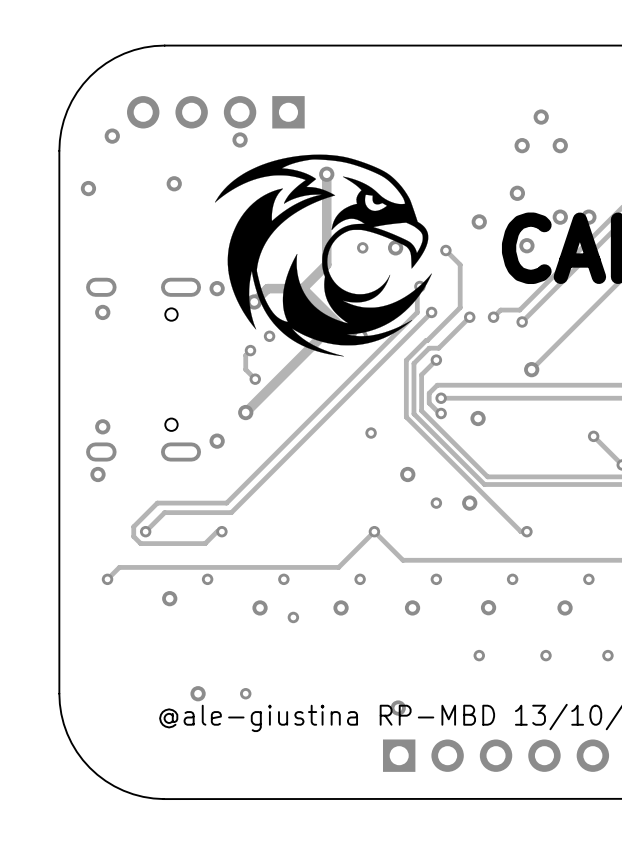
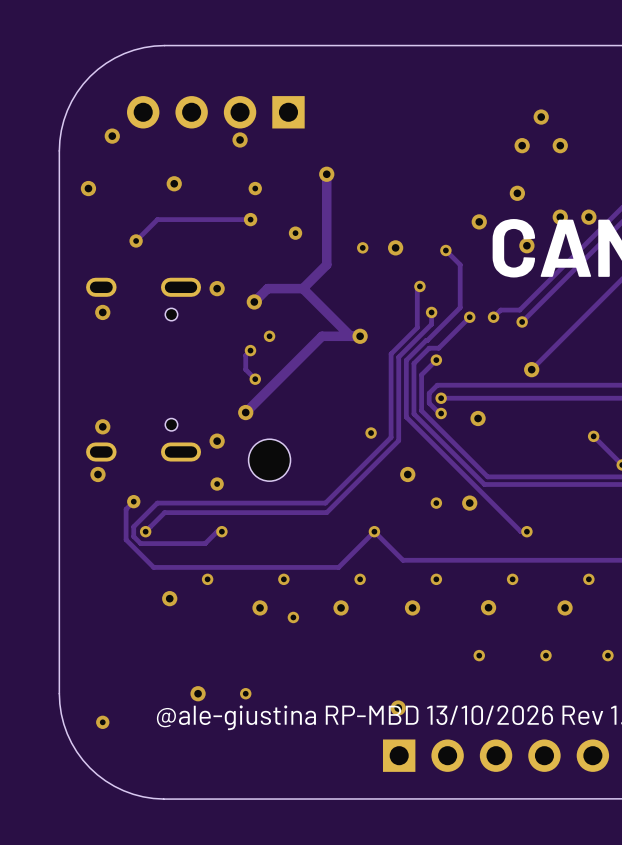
drawing: [214, 154, 432, 357] -> none
via: none -> (255, 188)
track: none -> (250, 219) (157, 219) (136, 240)
via: none -> (250, 219)
via: none -> (295, 233)
via: none -> (136, 240)
track: (417, 312) (226, 503) -> (417, 312) (417, 327) (391, 353) (391, 437) (325, 503) (226, 503)
track: (431, 312) (231, 512) -> (431, 312) (431, 324) (398, 357) (398, 440) (326, 512) (231, 512)
part: none -> (269, 460)
via: none -> (217, 484)
via: none -> (133, 501)
track: (153, 567) (119, 567) (107, 579) -> (153, 567) (126, 539) (126, 509) (133, 501)
via: (107, 579) -> none
via: none -> (102, 722)

